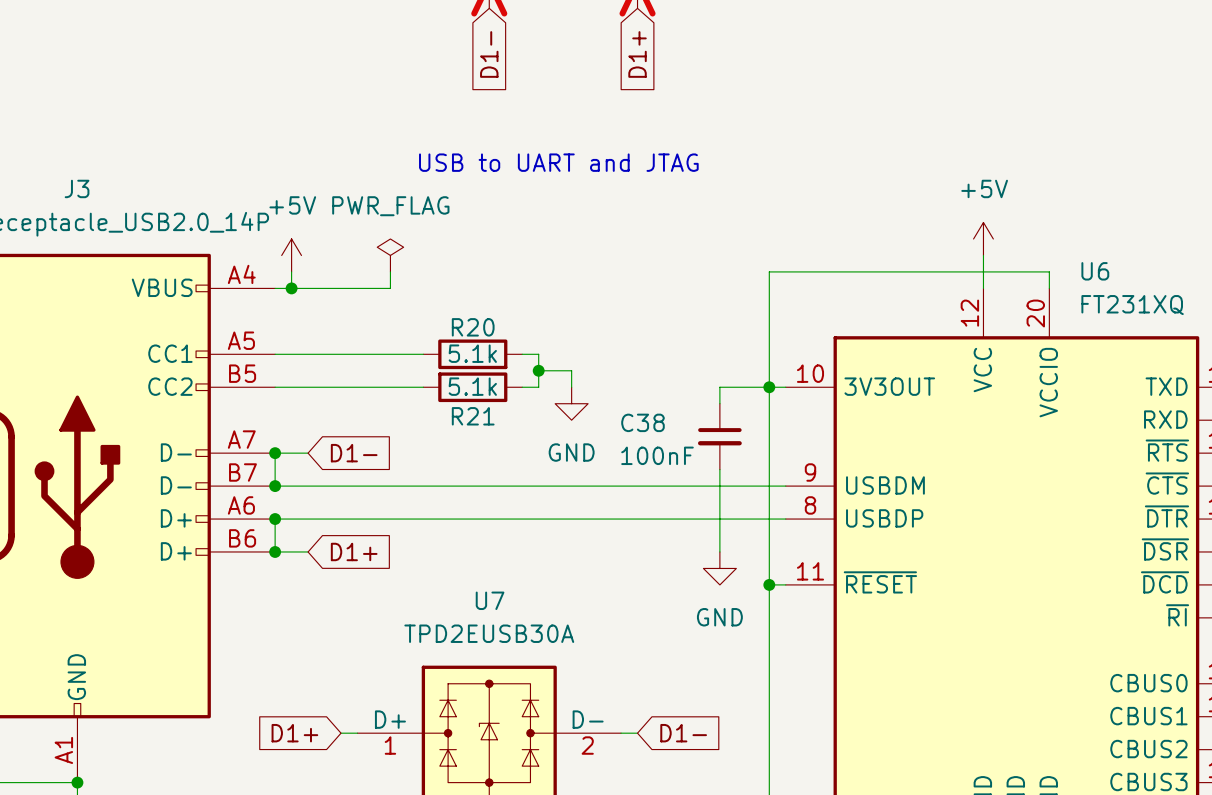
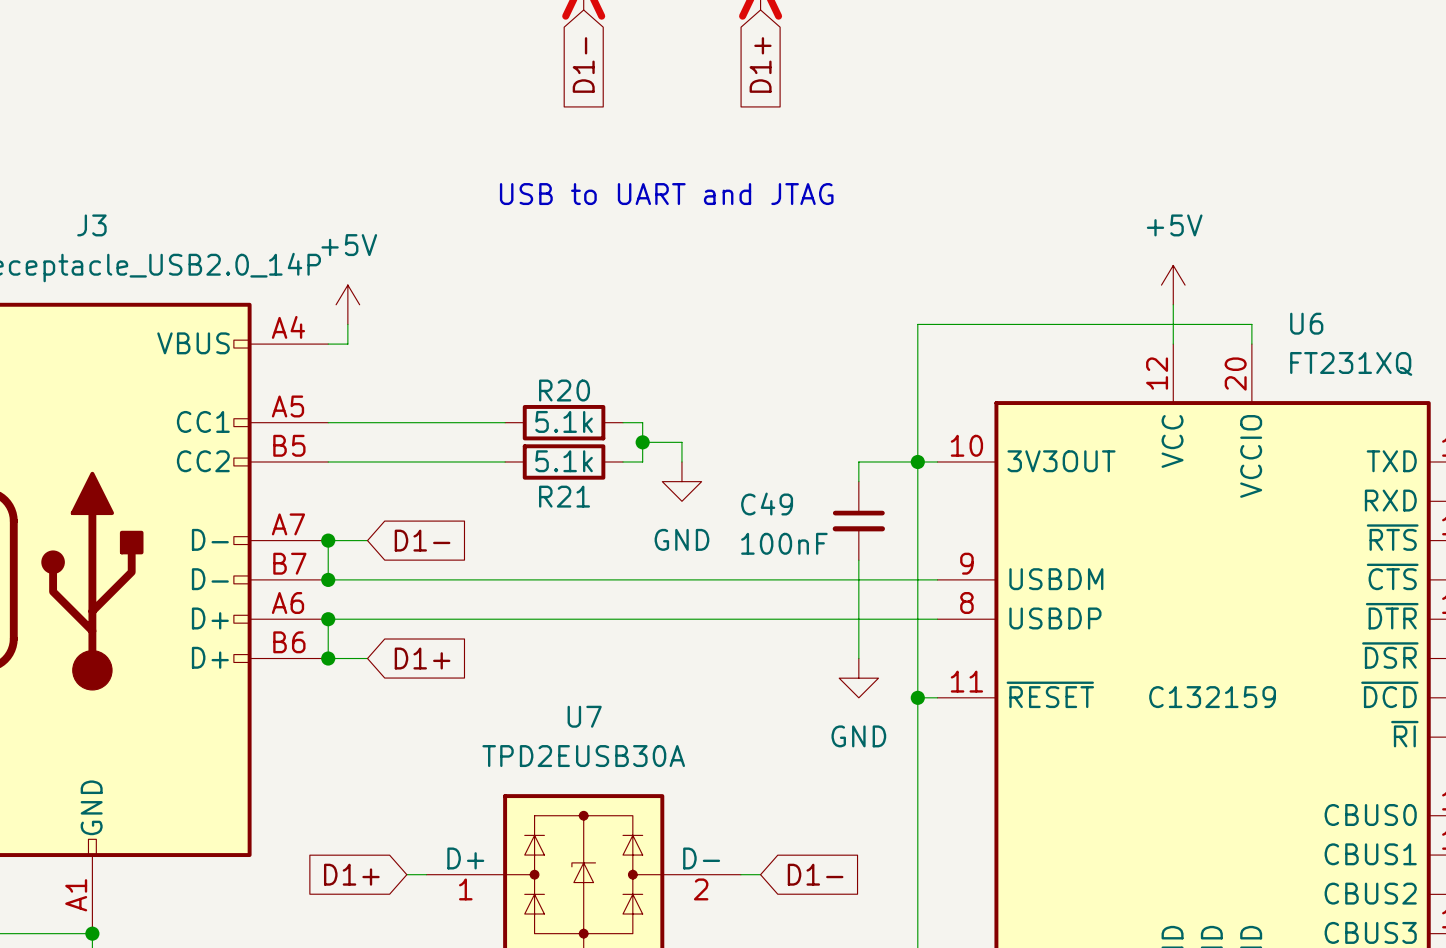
power symbol: PWR_FLAG (390, 255) -> none
wire: (390, 271) (390, 288) (291, 288) -> none
junction: (291, 288) -> none
C38 name: C38 (642, 422) -> C49 (767, 504)
U6 text: none -> C132159 (1212, 697)

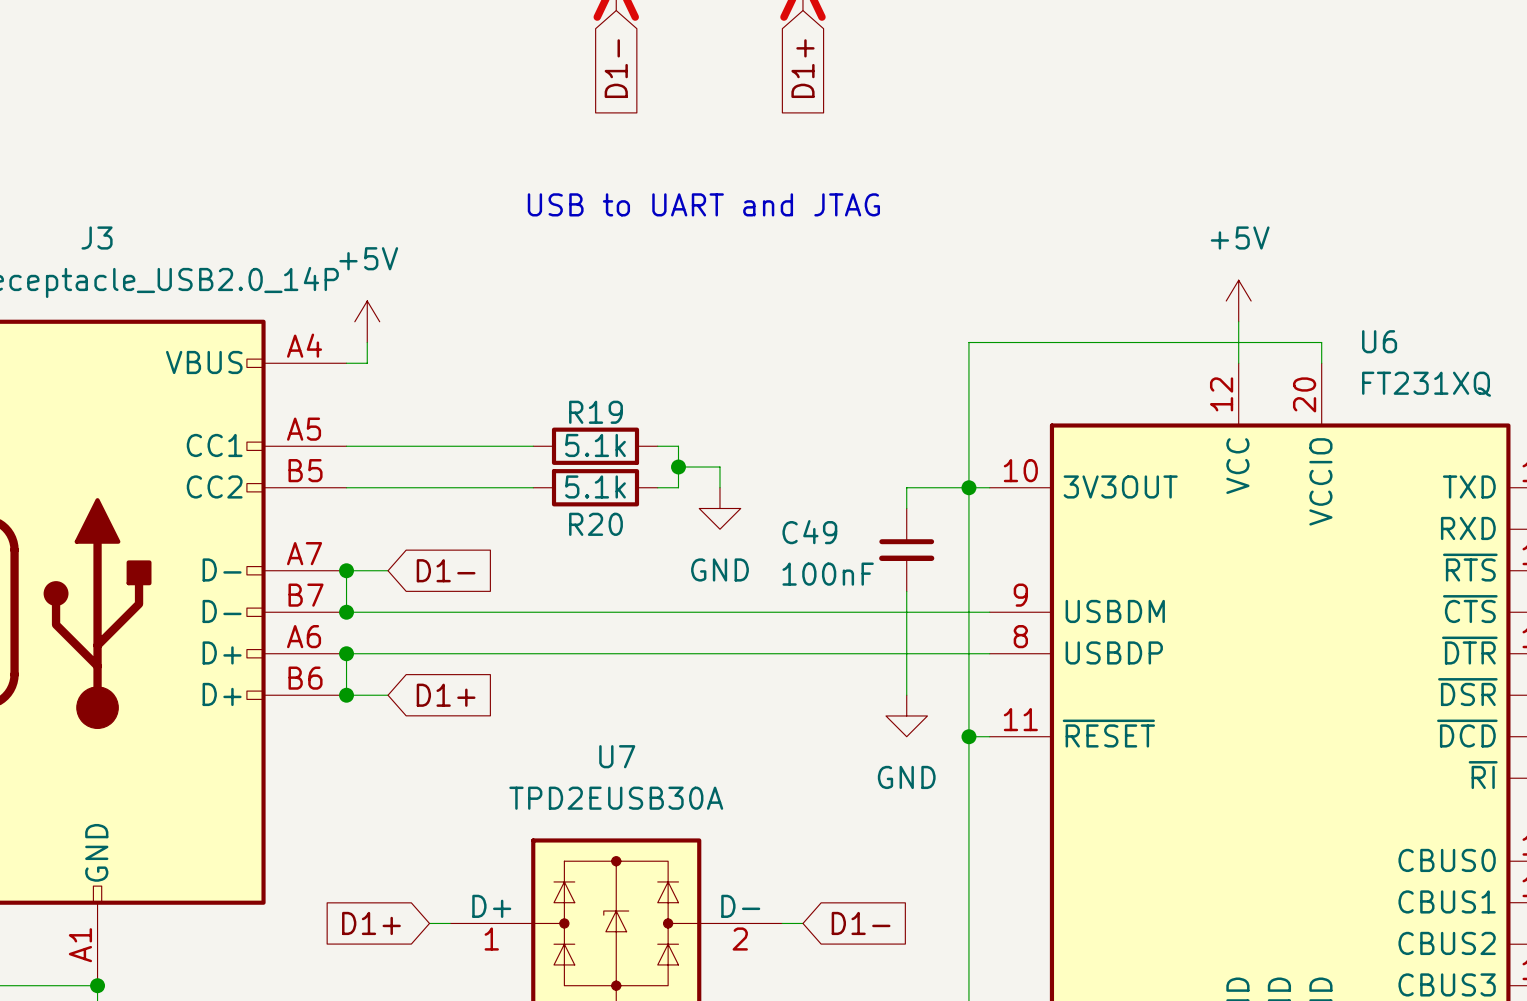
R20 name: R20 (564, 390) -> R19 (595, 412)
R21 name: R21 (564, 496) -> R20 (595, 524)
U6 text: C132159 (1212, 697) -> none

